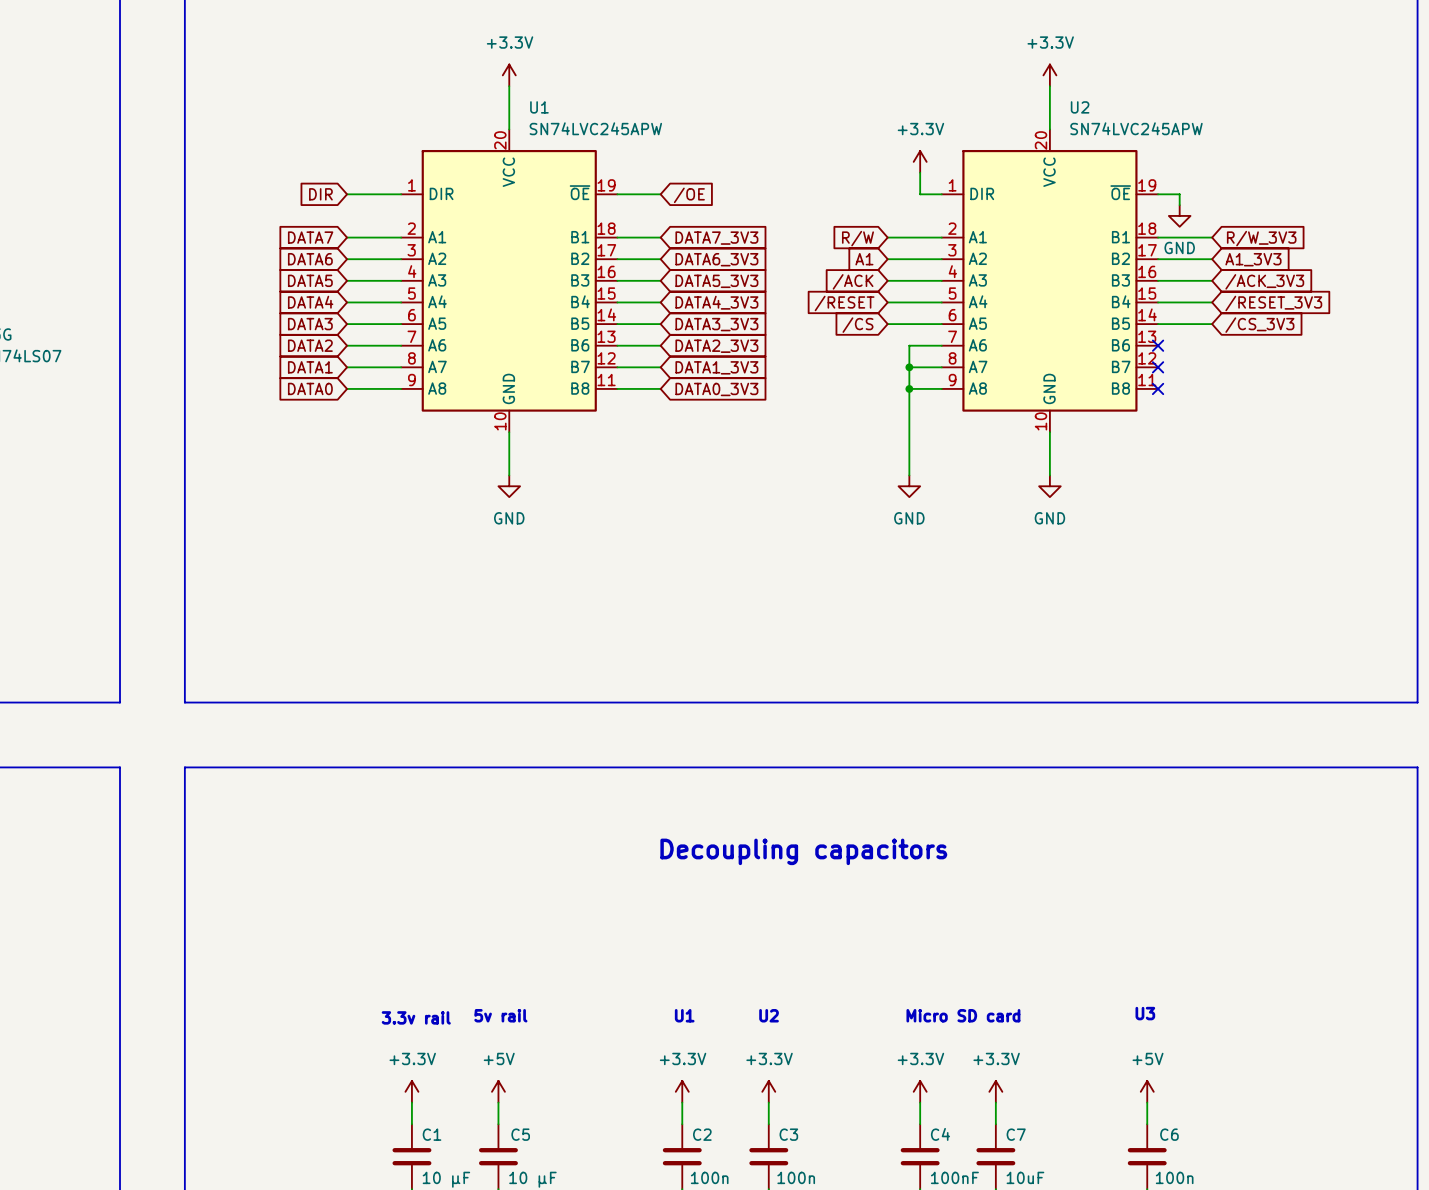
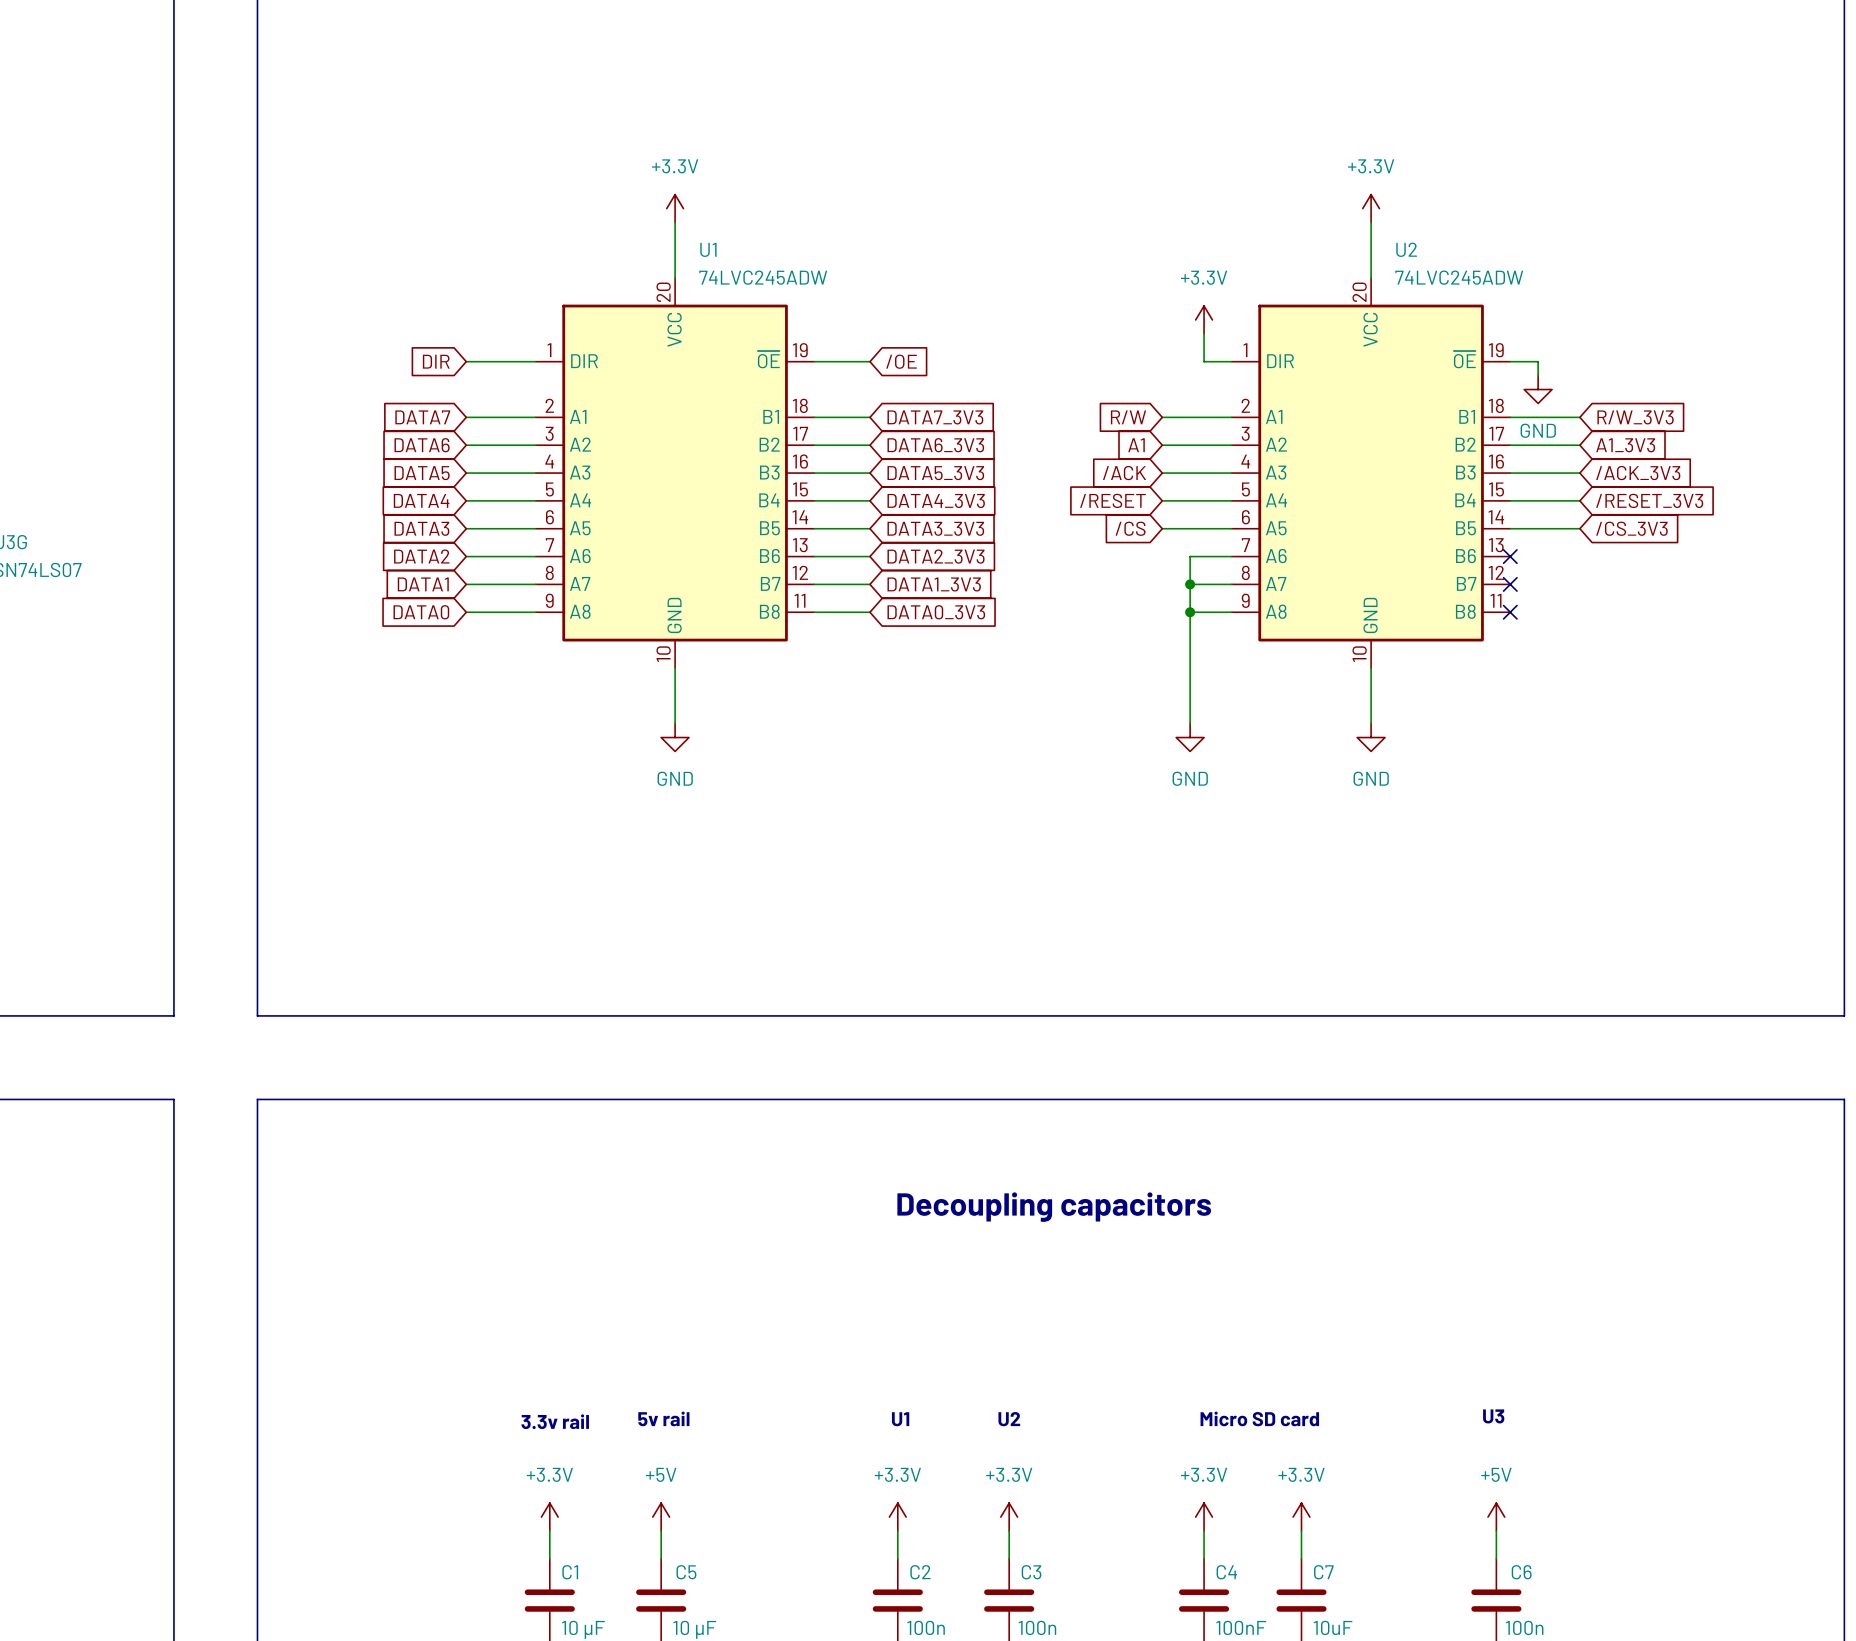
U1 value: SN74LVC245APW (595, 128) -> 74LVC245ADW (763, 277)
U2 value: SN74LVC245APW (1136, 128) -> 74LVC245ADW (1459, 277)

